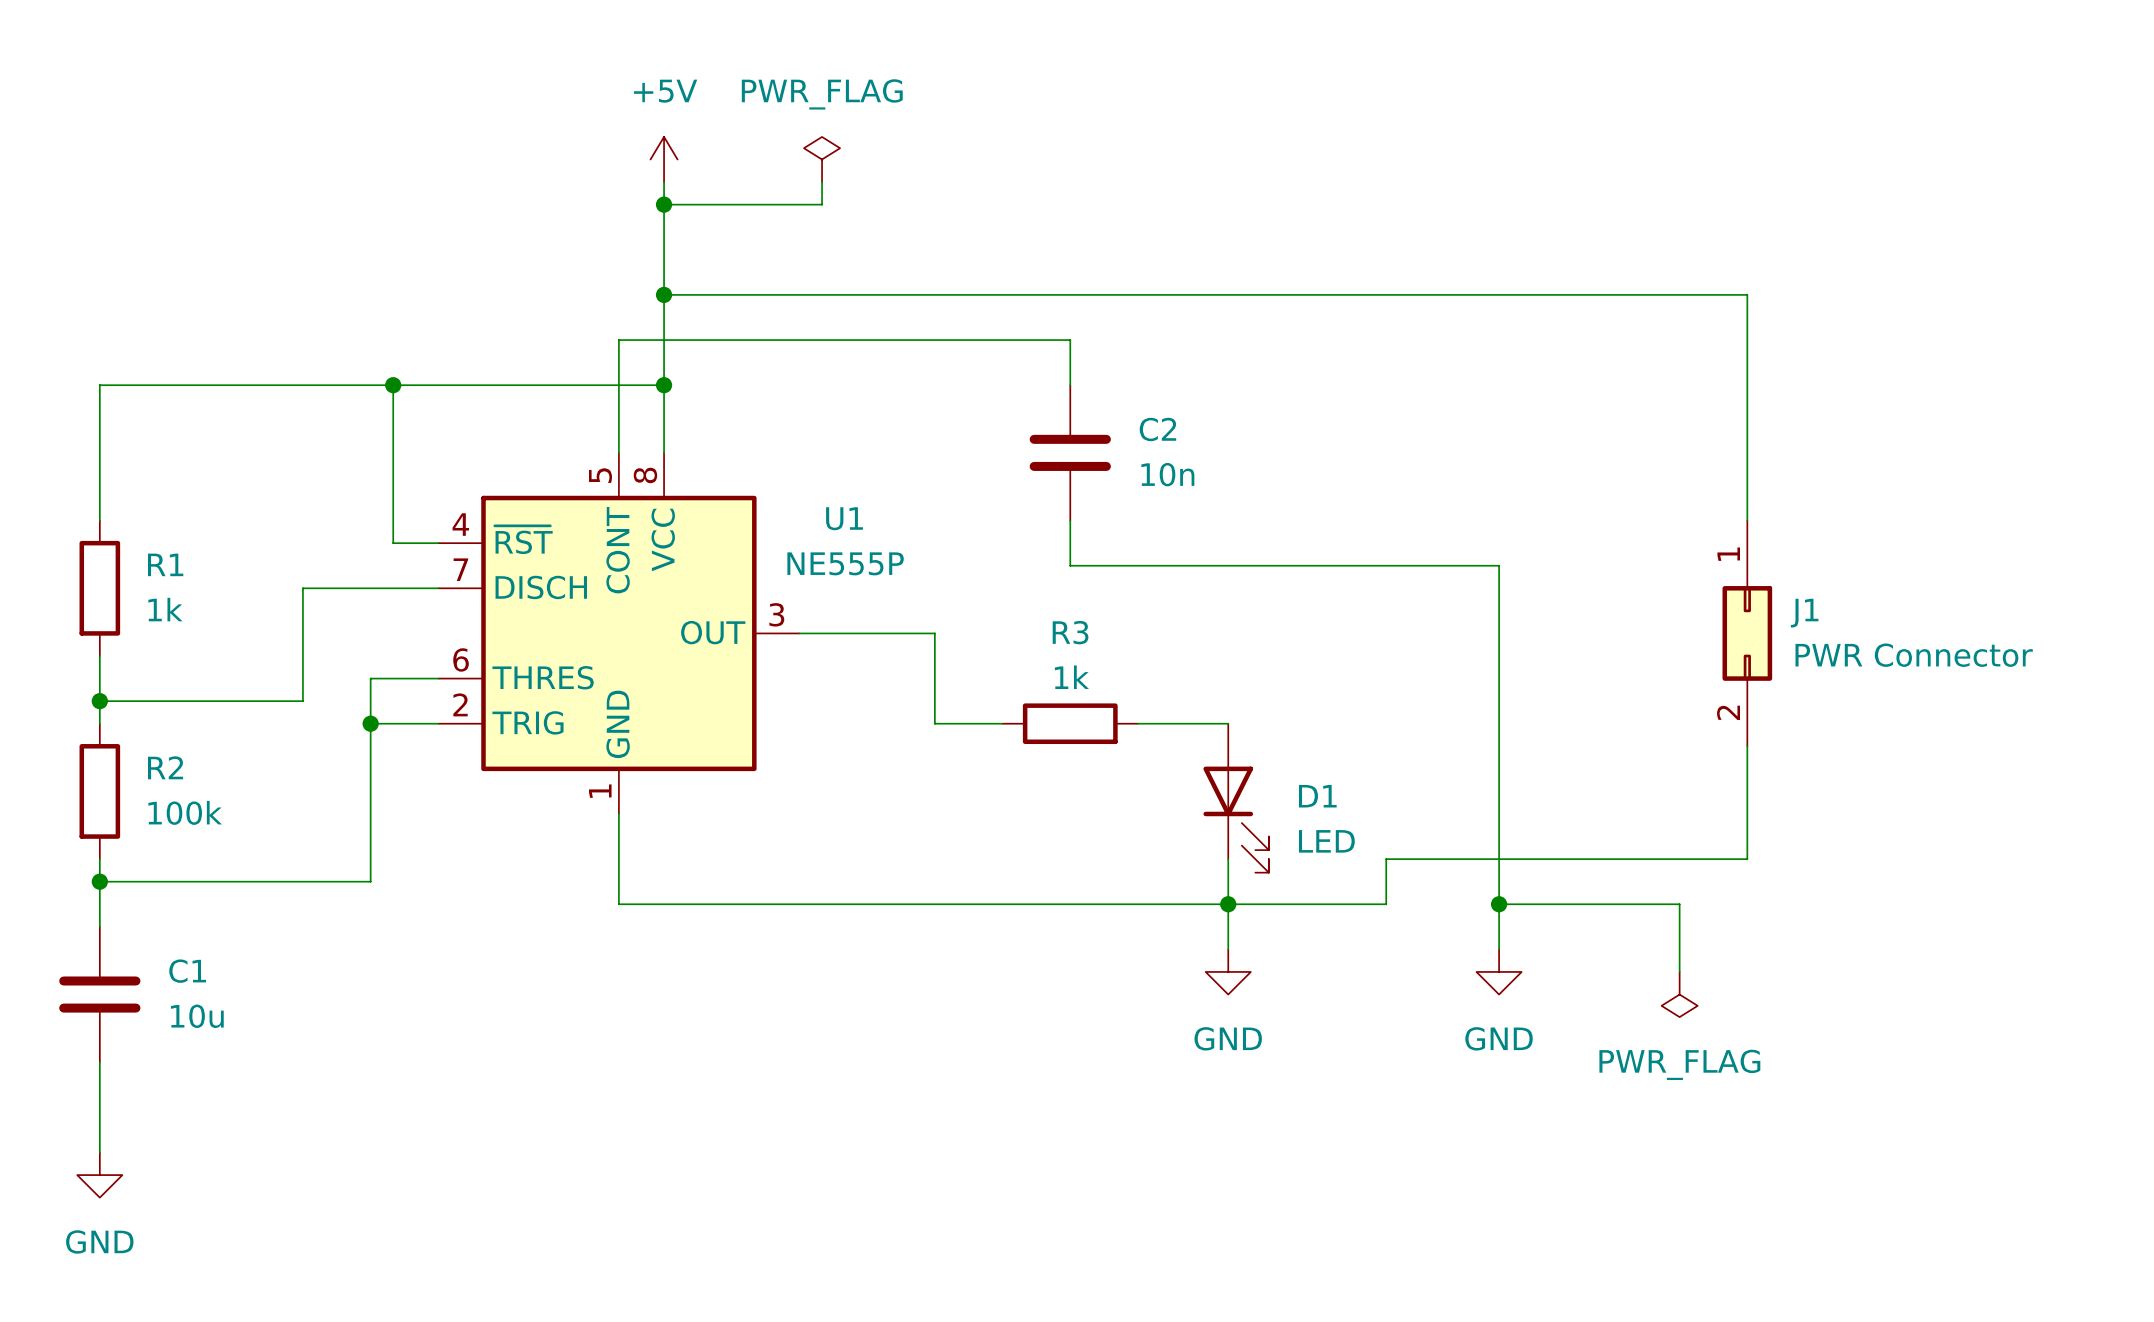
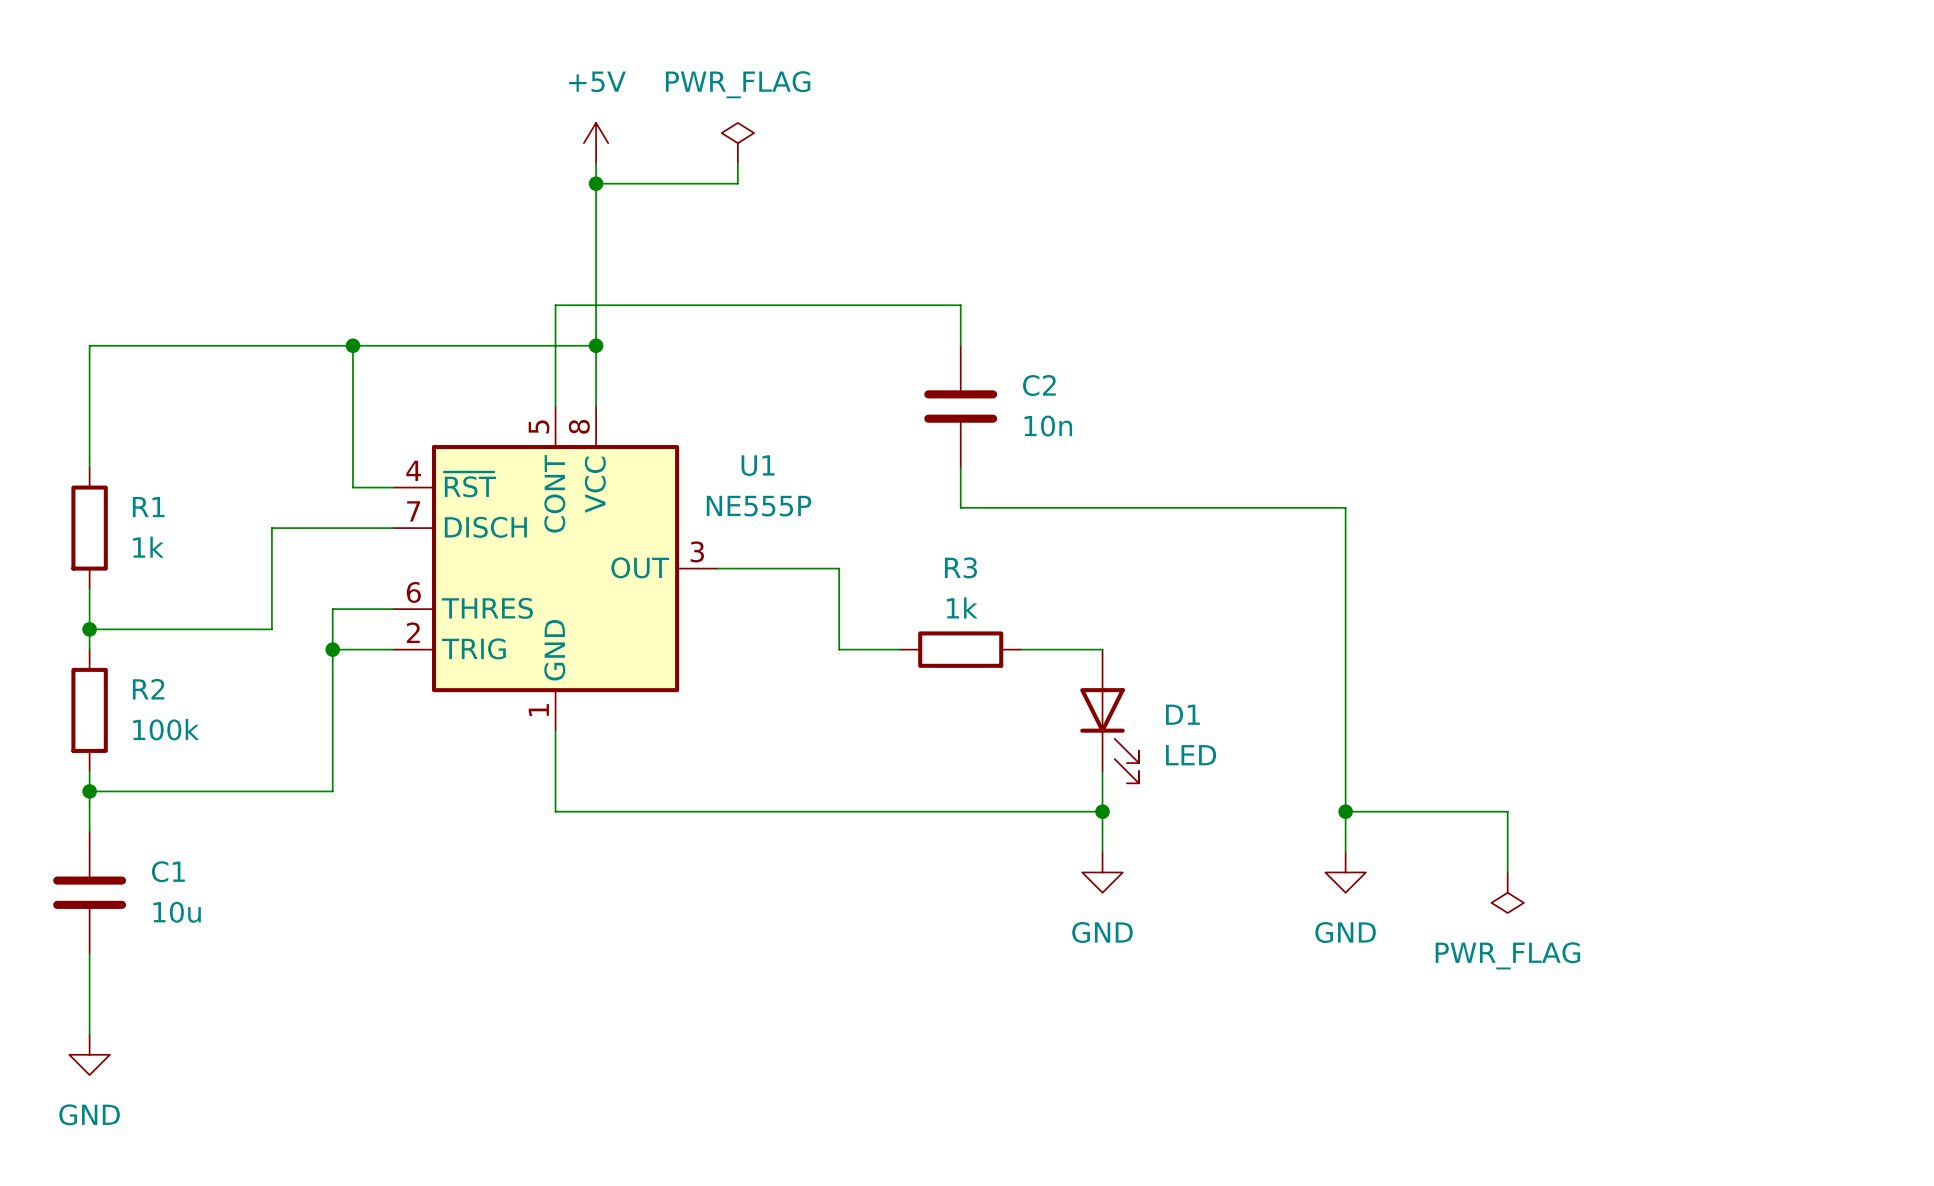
wire: (664, 294) (1747, 294) (1747, 520) -> none
junction: (664, 294) -> none
J1: PWR Connector (1747, 633) -> none
wire: (1747, 746) (1747, 859) (1386, 859) (1386, 904) (1228, 904) -> none

